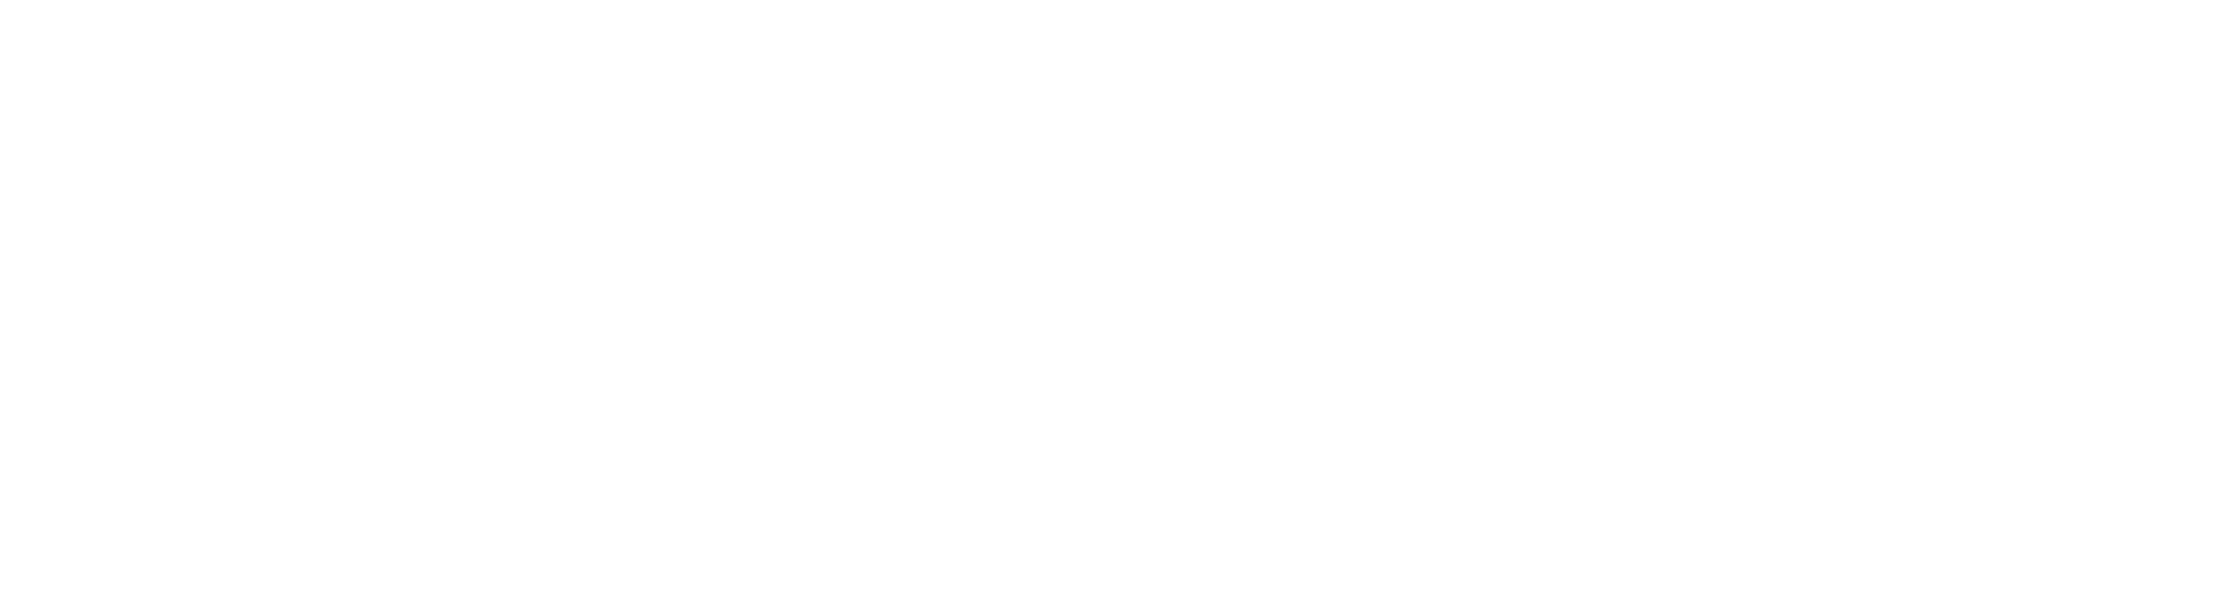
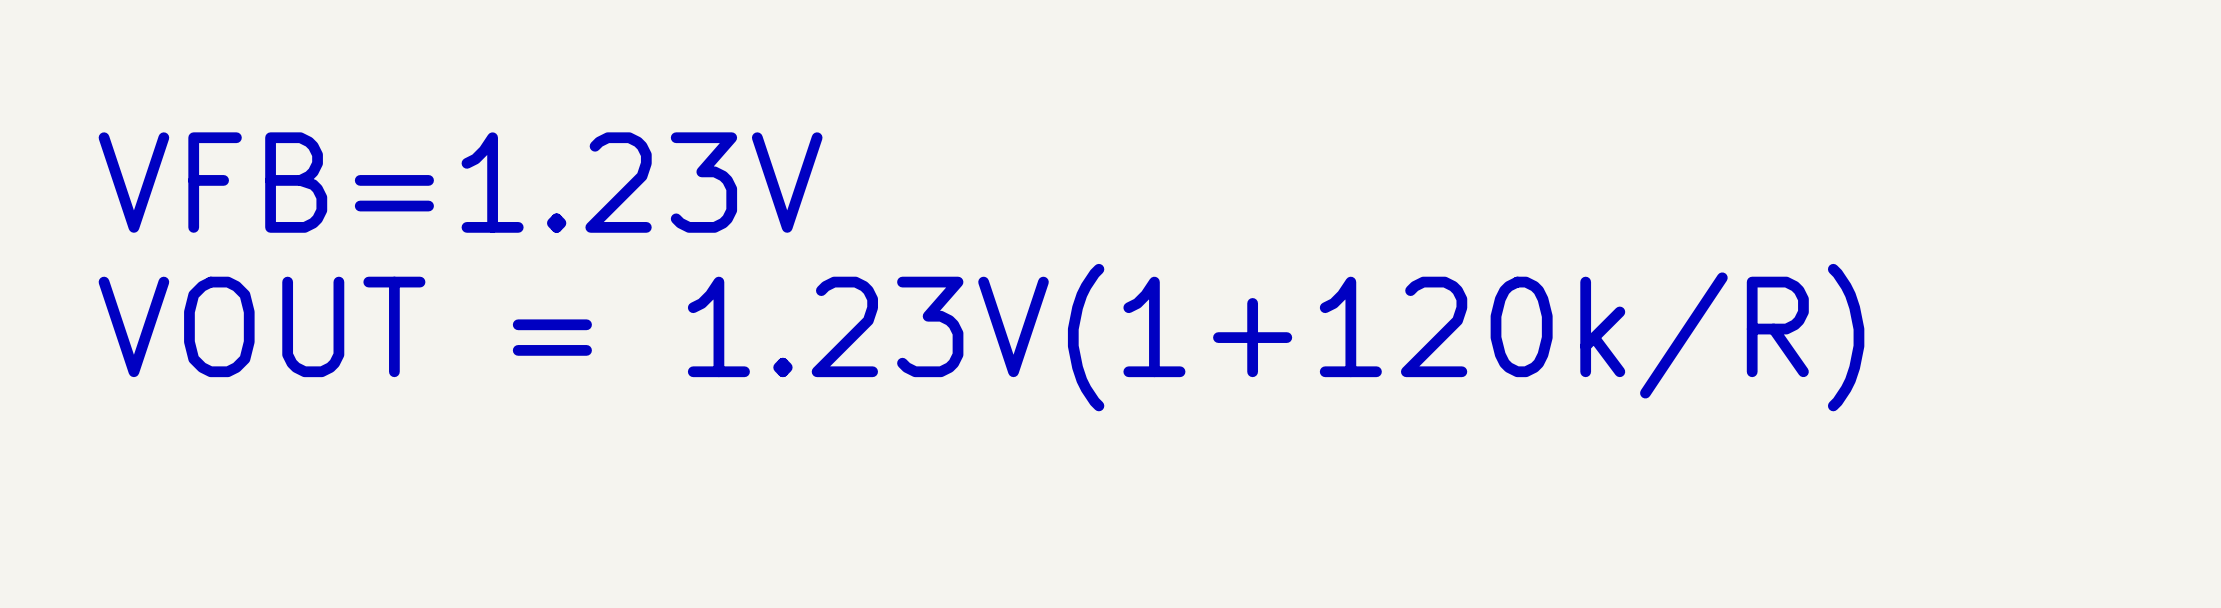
text: none -> VFB=1.23V (460, 182)
text: none -> VOUT = 1.23V(1+120k/R) (981, 337)

